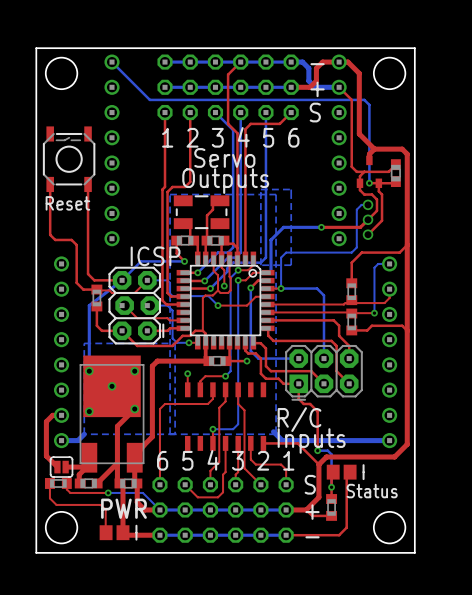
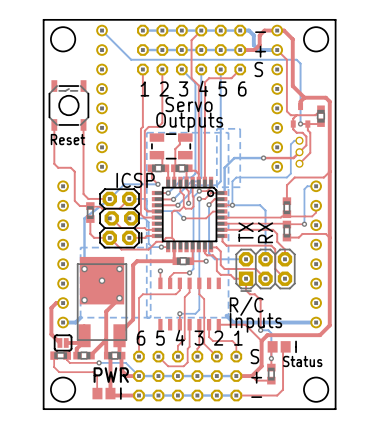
text: none -> TX (246, 232)
text: none -> RX (265, 232)

